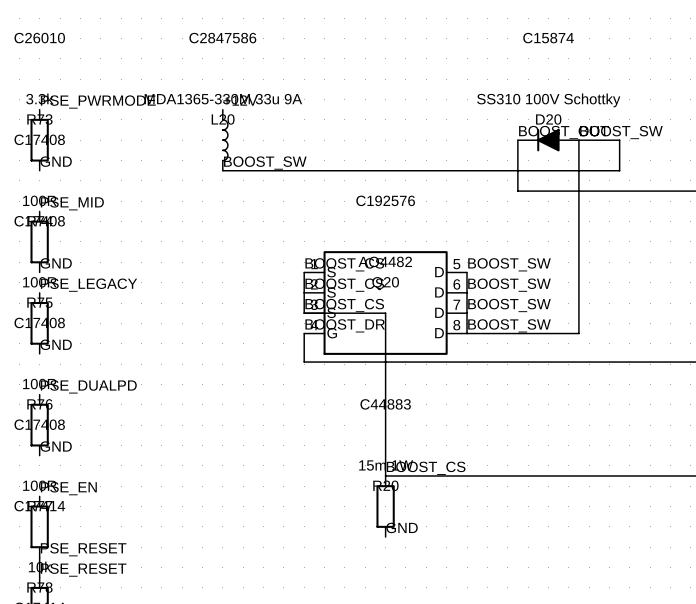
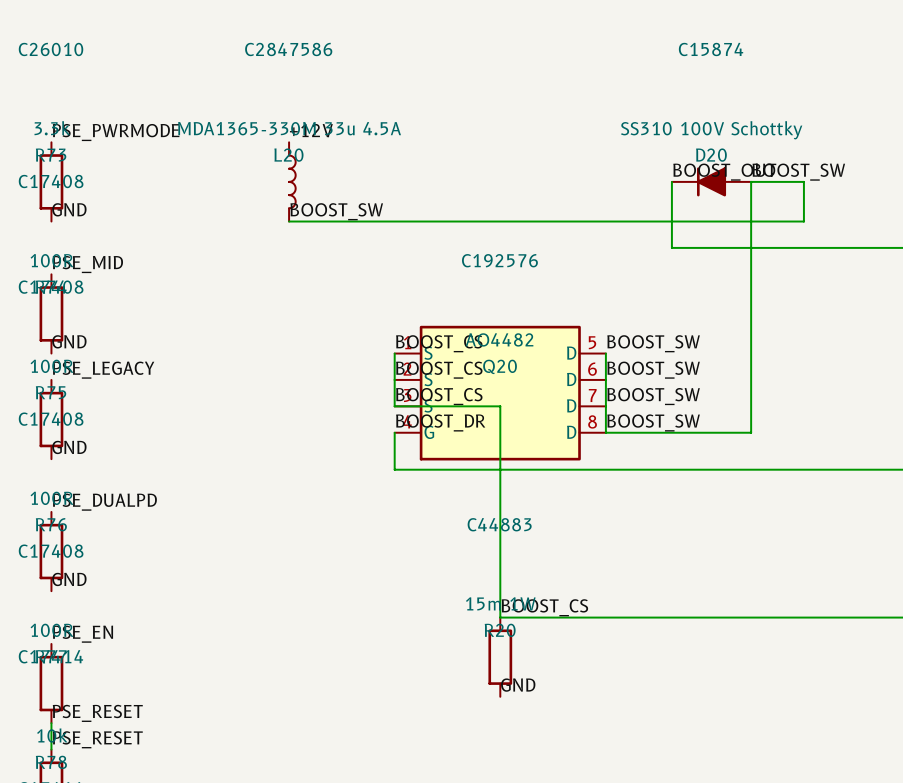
L20 value: MDA1365-330M 33u 9A (223, 99) -> MDA1365-330M 33u 4.5A (289, 128)

